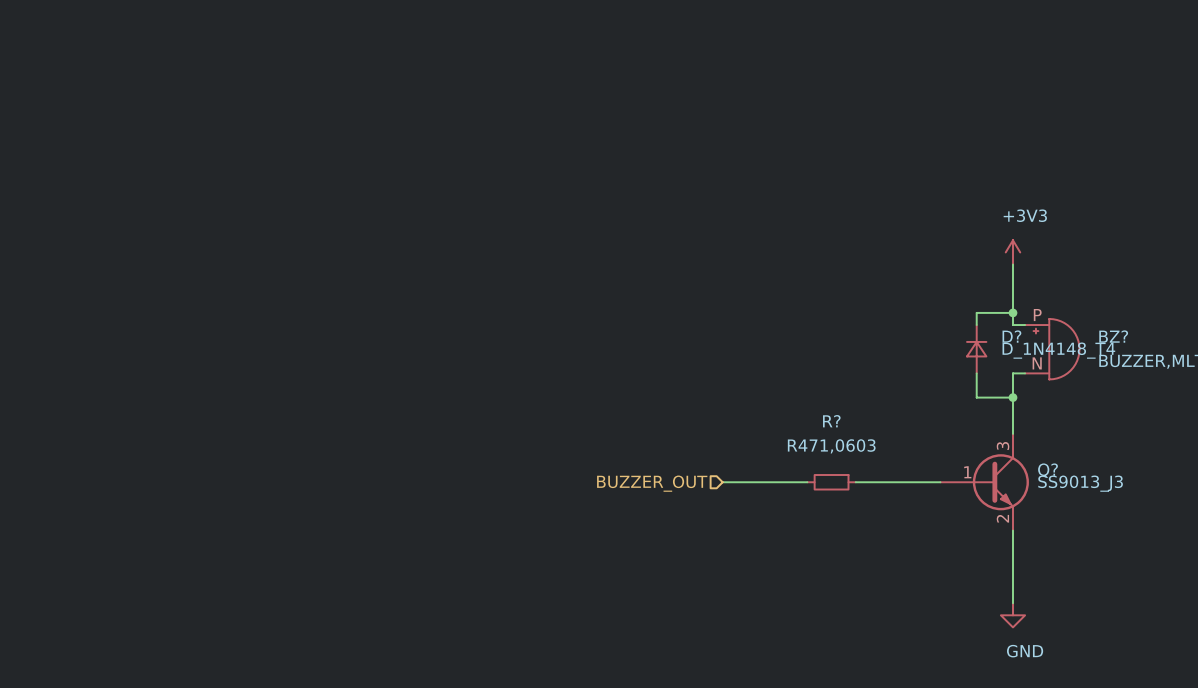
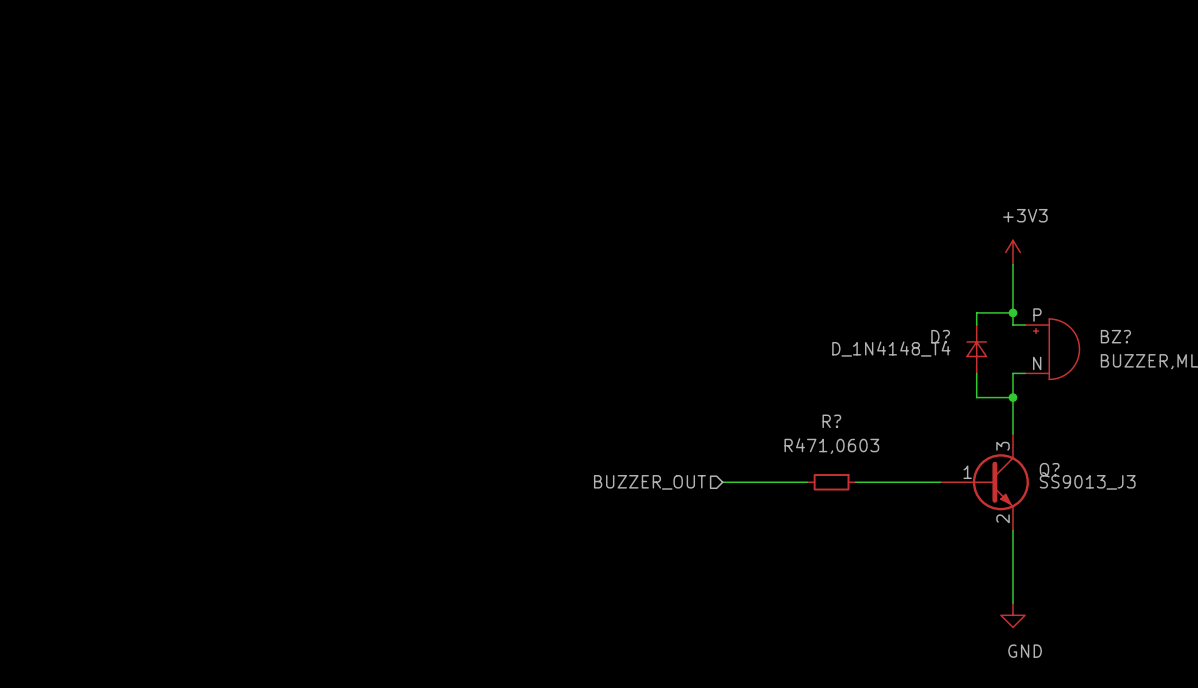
D? name position: D? (1011, 336) -> D? (940, 336)
D? value position: D_1N4148_T4 (1058, 350) -> D_1N4148_T4 (891, 349)

